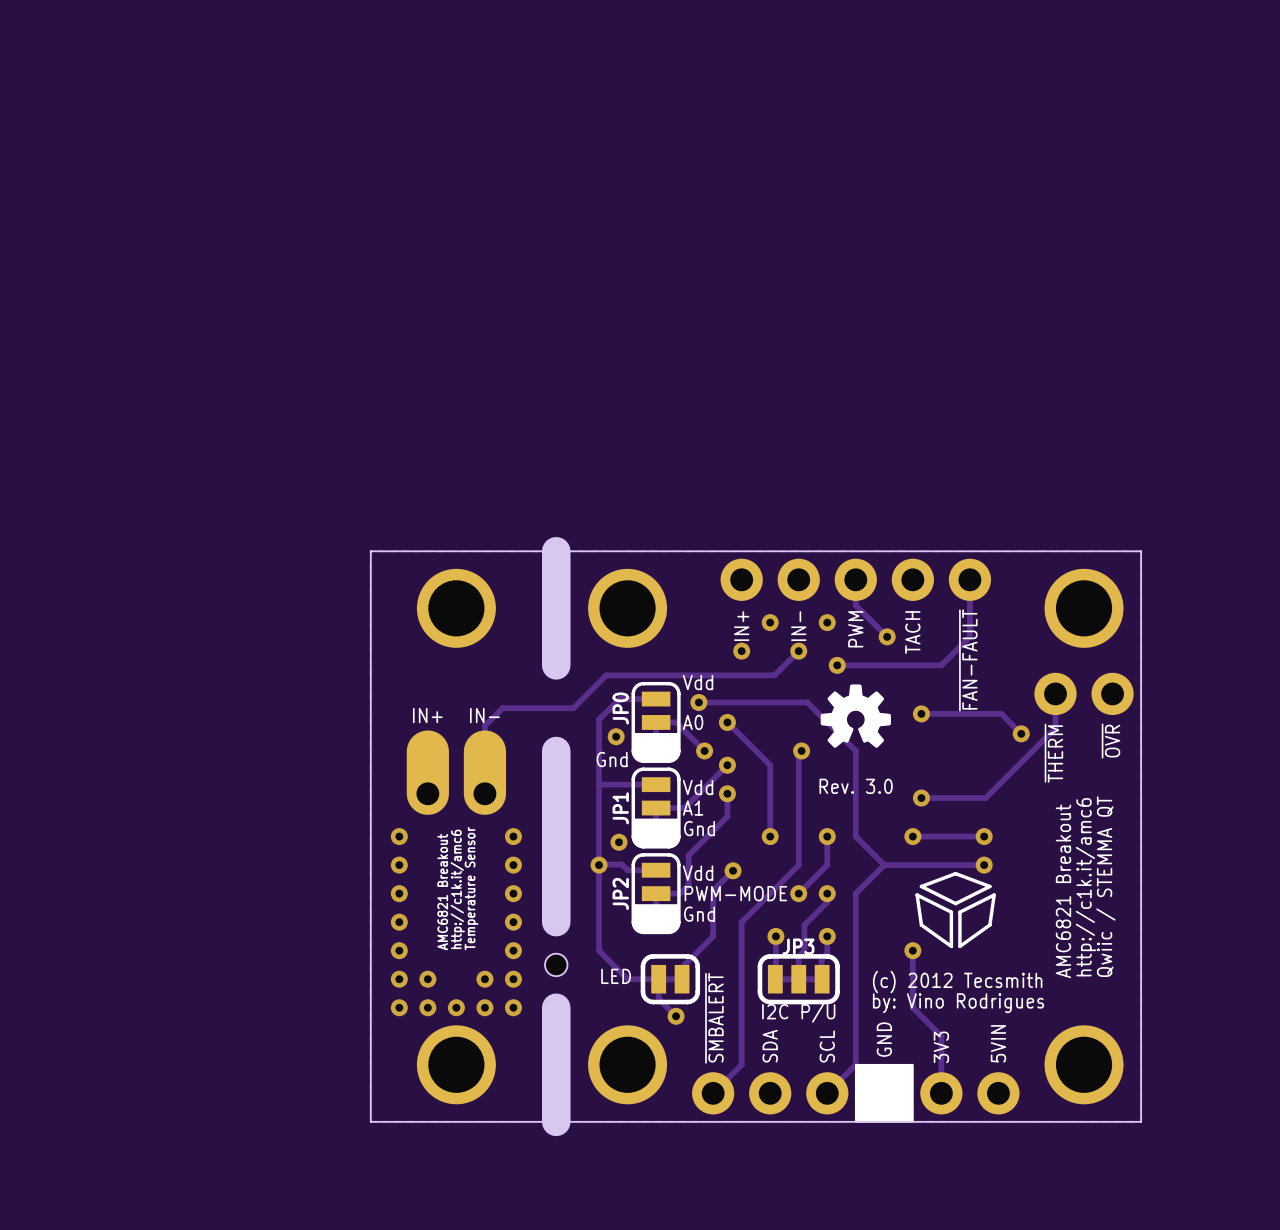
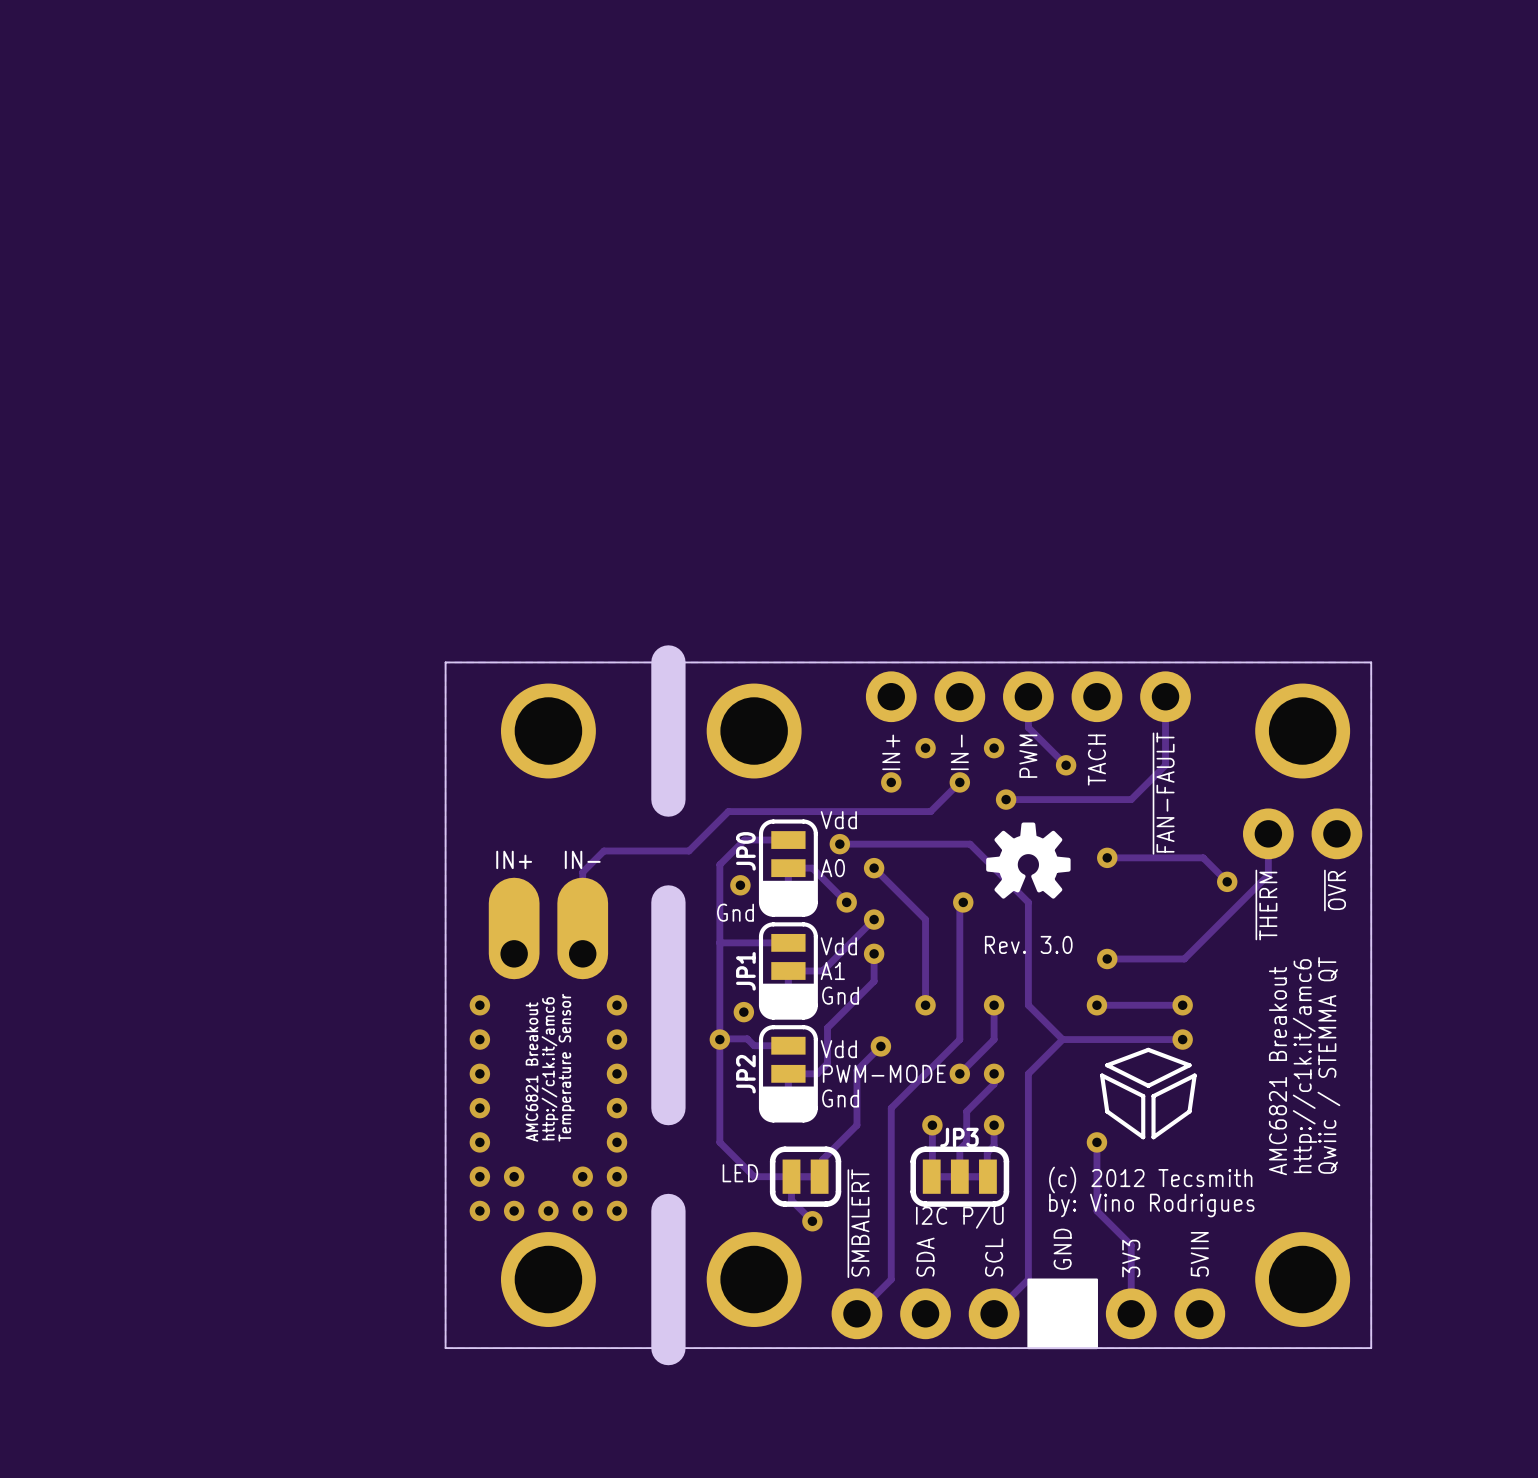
hole: (556, 964) -> none

